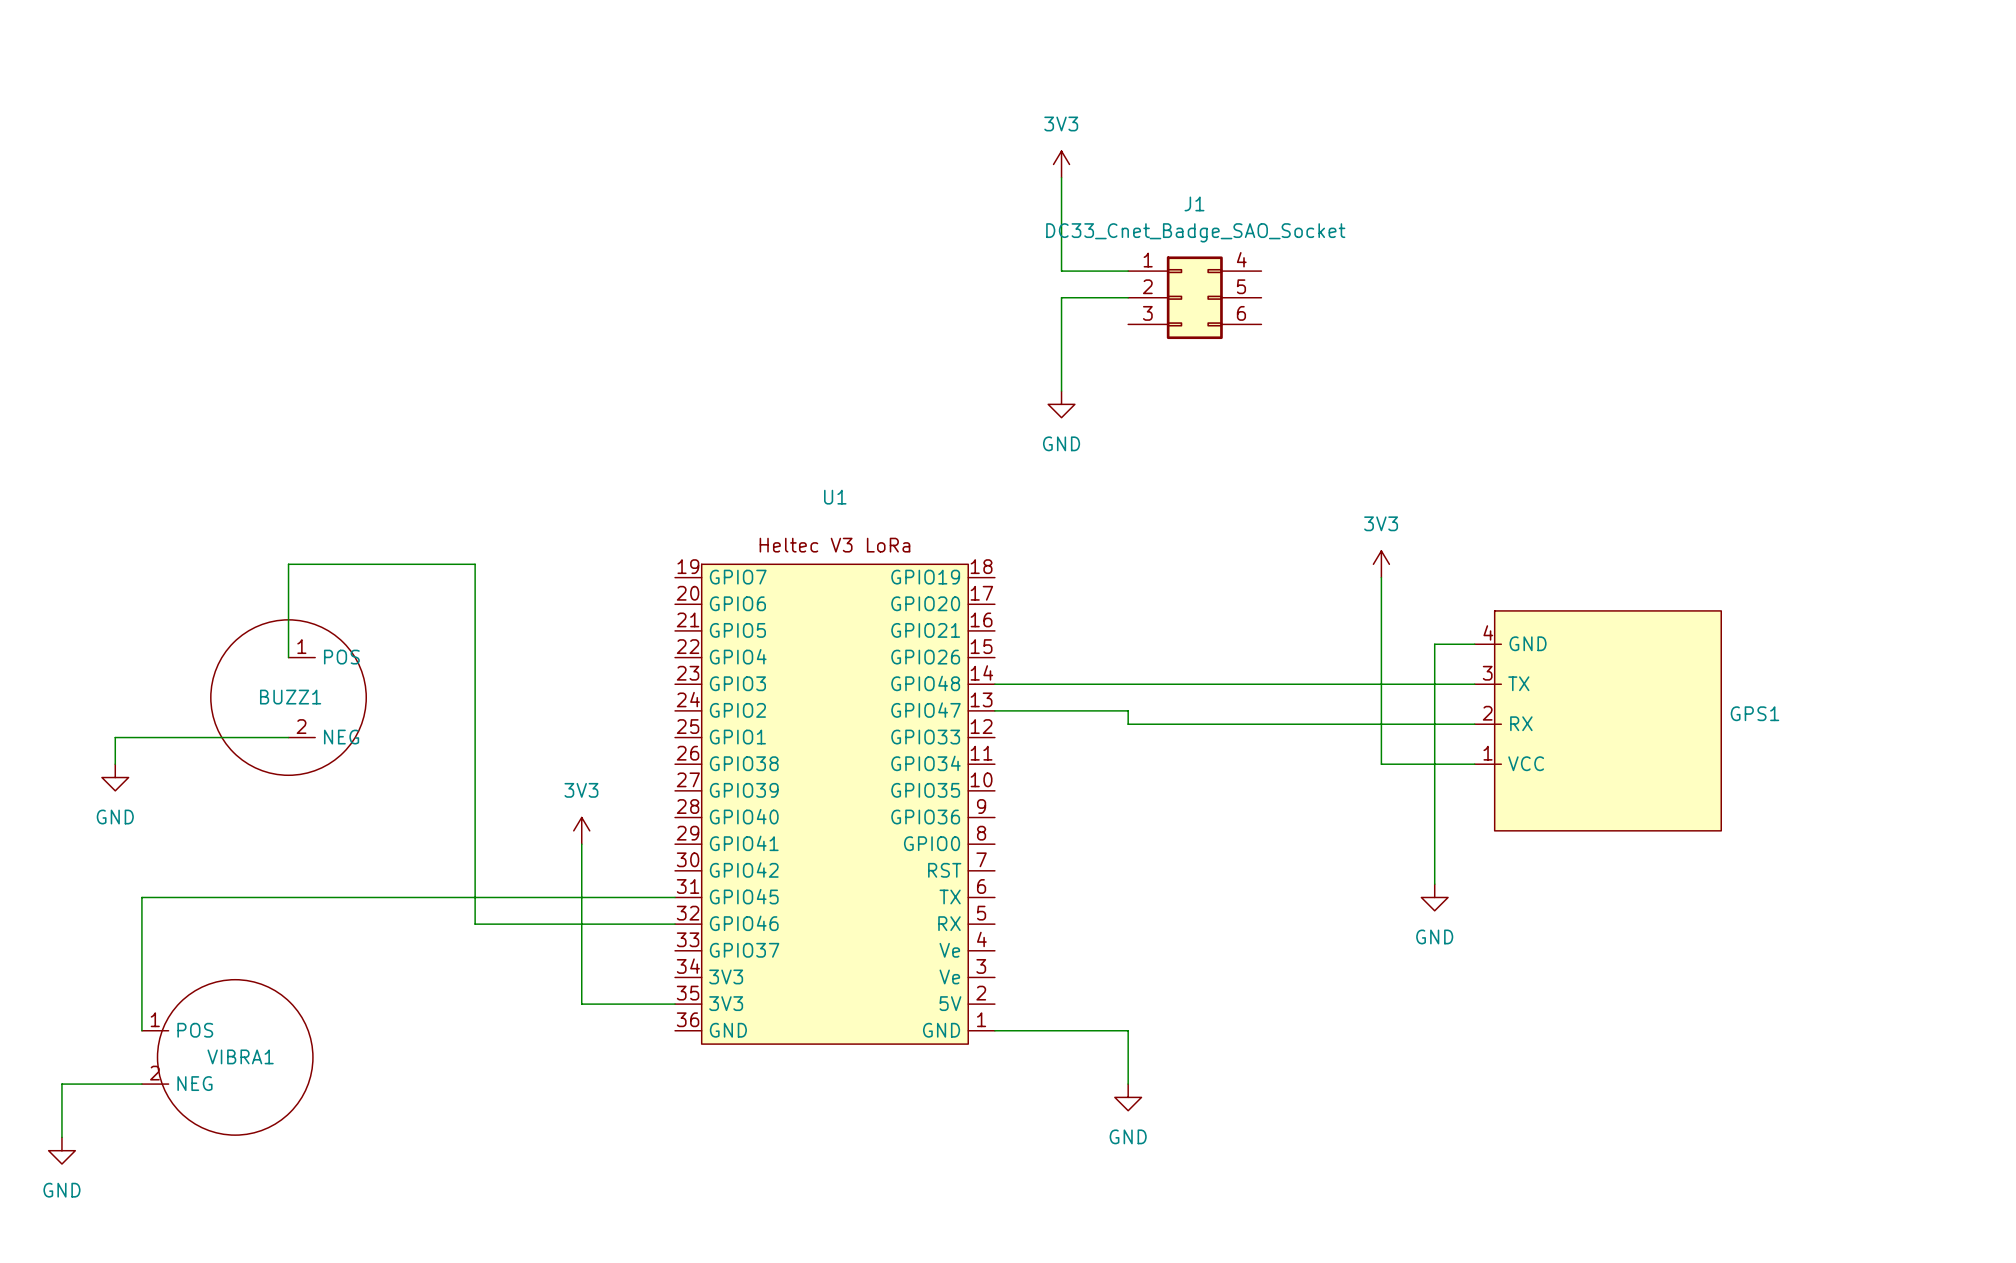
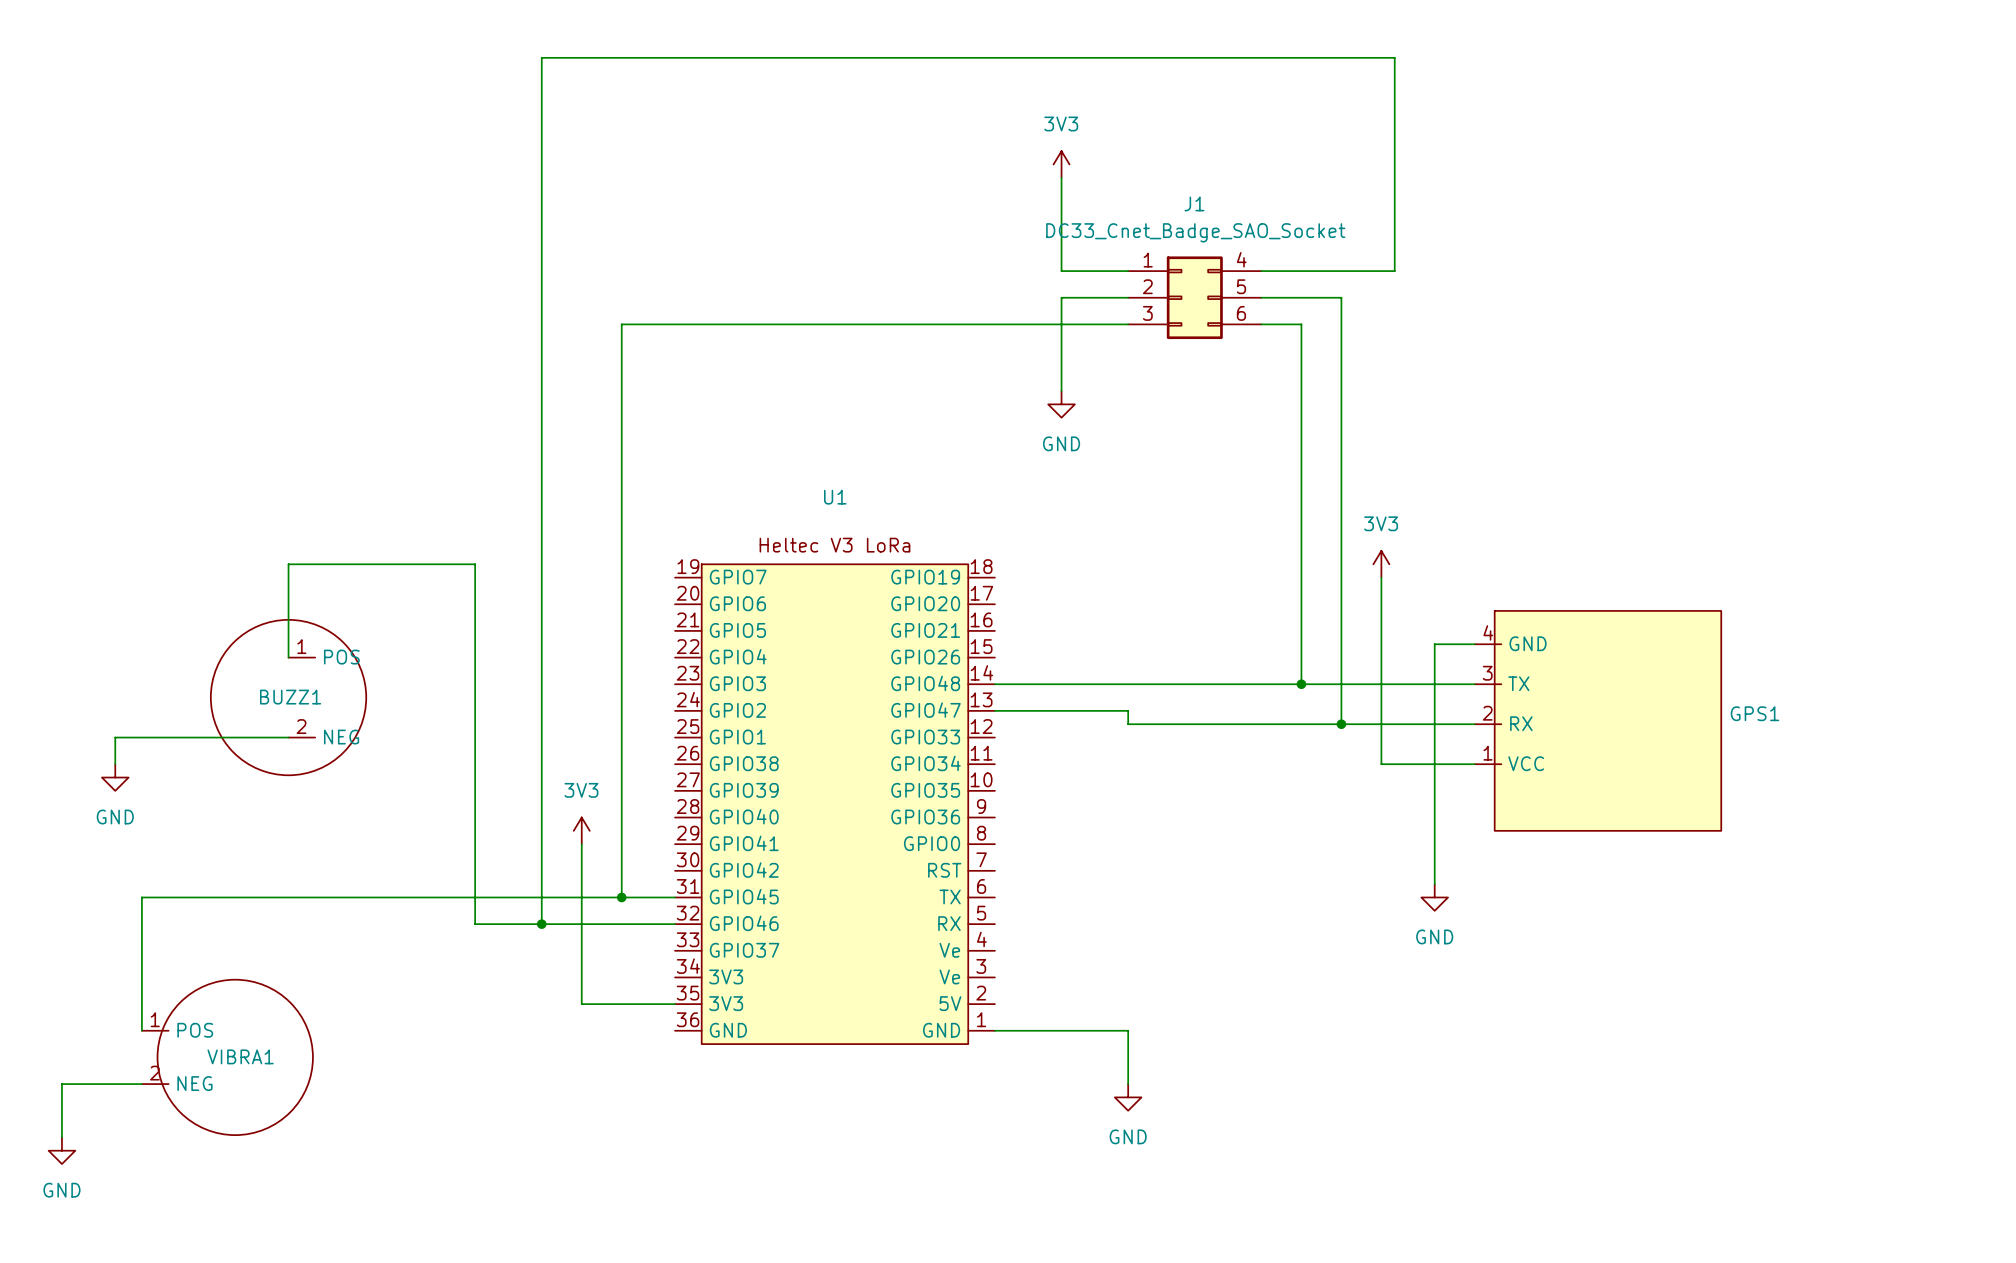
wire: none -> (1261, 271) (1394, 271) (1394, 57) (541, 57) (541, 924)
wire: none -> (1261, 297) (1341, 297) (1341, 724)
wire: none -> (1128, 324) (621, 324) (621, 897)
wire: none -> (1261, 324) (1301, 324) (1301, 684)
junction: none -> (1301, 684)
junction: none -> (1341, 724)
junction: none -> (621, 897)
junction: none -> (541, 924)

